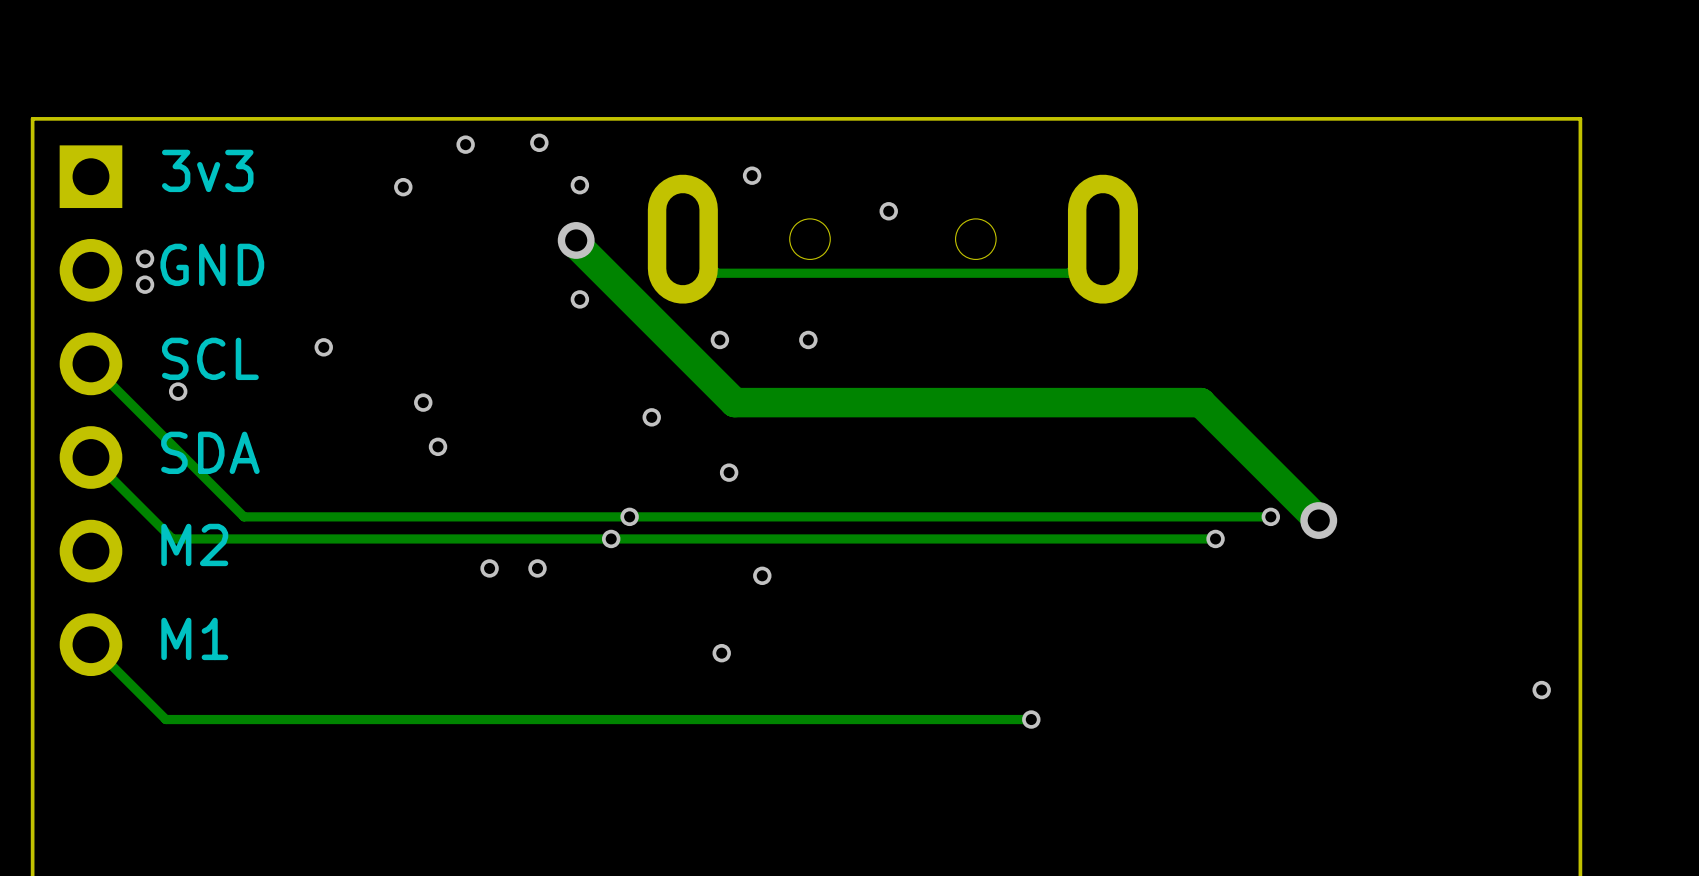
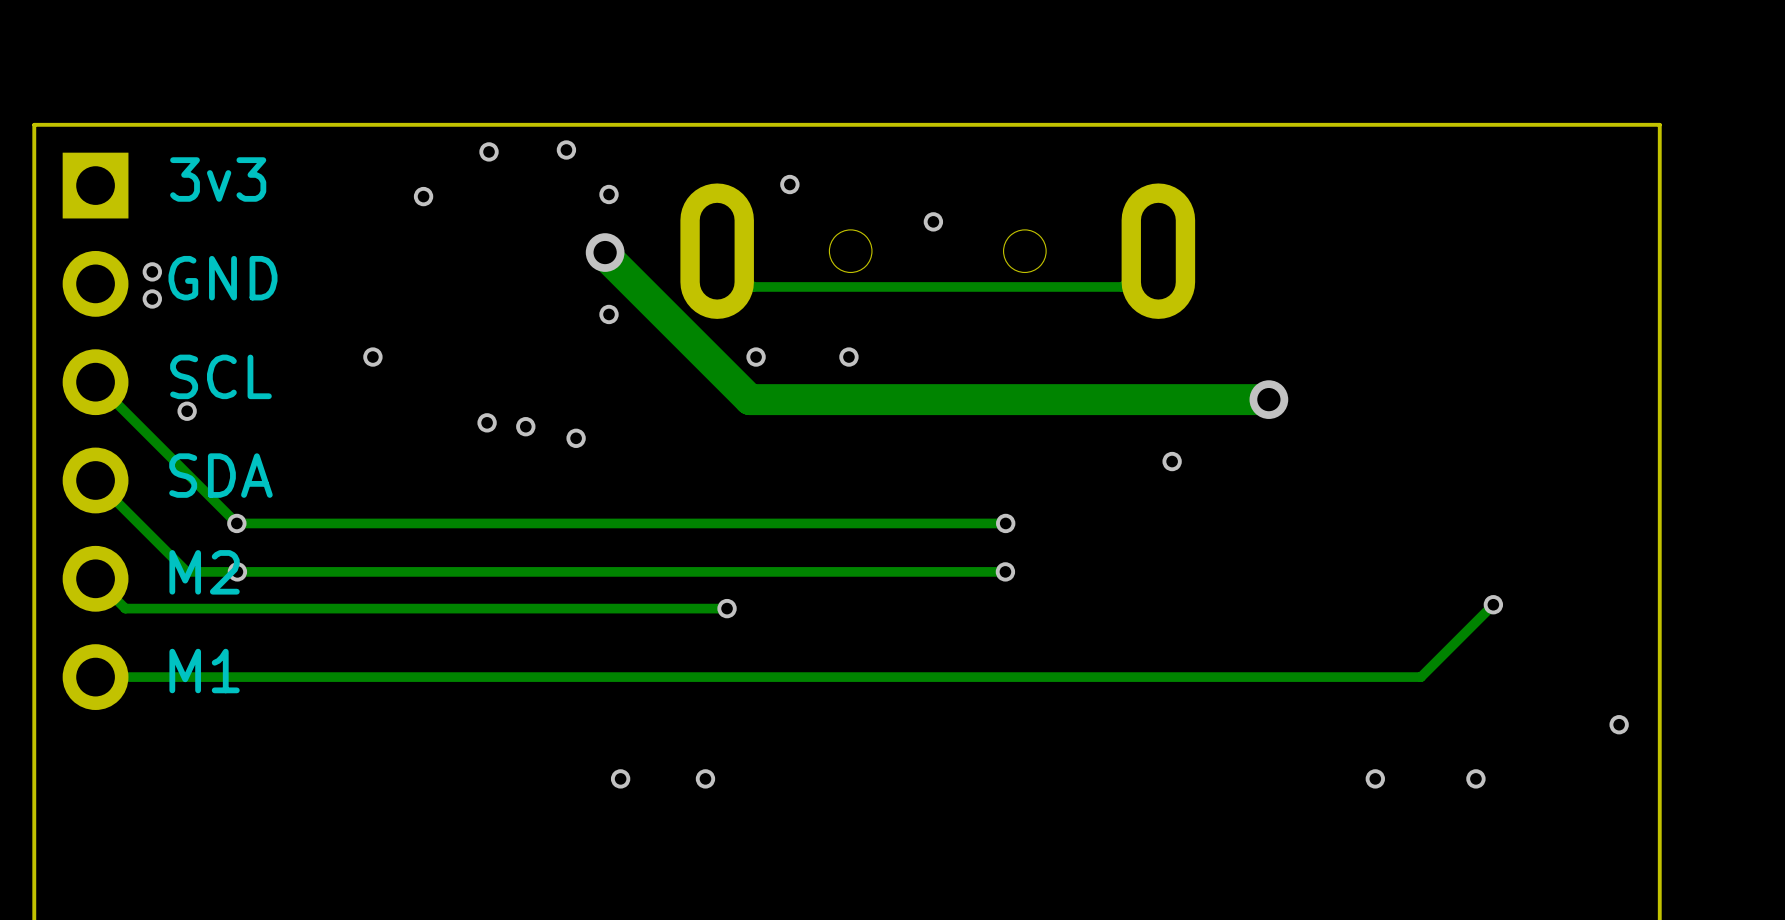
track: (576, 240) (576, 244) (734, 402) (1200, 402) (1318, 520) -> none
track: none -> (605, 256) (749, 399) (1268, 399)
via position: (323, 347) -> (372, 357)
via: (423, 402) -> none
via: none -> (487, 422)
via: none -> (525, 426)
via: none -> (576, 438)
via: (651, 417) -> none
via: none -> (1172, 461)
via: (438, 446) -> none
via: (729, 472) -> none
track: (225, 498) (243, 516) (1270, 516) -> (236, 523) (1005, 523)
via: none -> (236, 523)
via: none -> (1005, 523)
via: (629, 516) -> none
via: (1270, 516) -> none
via position: (1318, 520) -> (1268, 399)
via: (611, 538) -> none
track: (1215, 538) (172, 538) -> (1005, 571) (186, 571) (181, 566)
via: (1215, 538) -> none
via: none -> (237, 571)
via: none -> (1005, 571)
track: none -> (95, 578) (125, 608) (727, 608)
via: (489, 568) -> none
via: (537, 568) -> none
via: (762, 575) -> none
via: none -> (1493, 604)
via: none -> (727, 608)
track: (90, 644) (165, 719) (1031, 719) -> (95, 677) (1421, 677) (1493, 604)
via: (721, 653) -> none
via: (1031, 719) -> none
via: none -> (620, 778)
via: none -> (705, 778)
via: none -> (1375, 778)
via: none -> (1475, 778)

